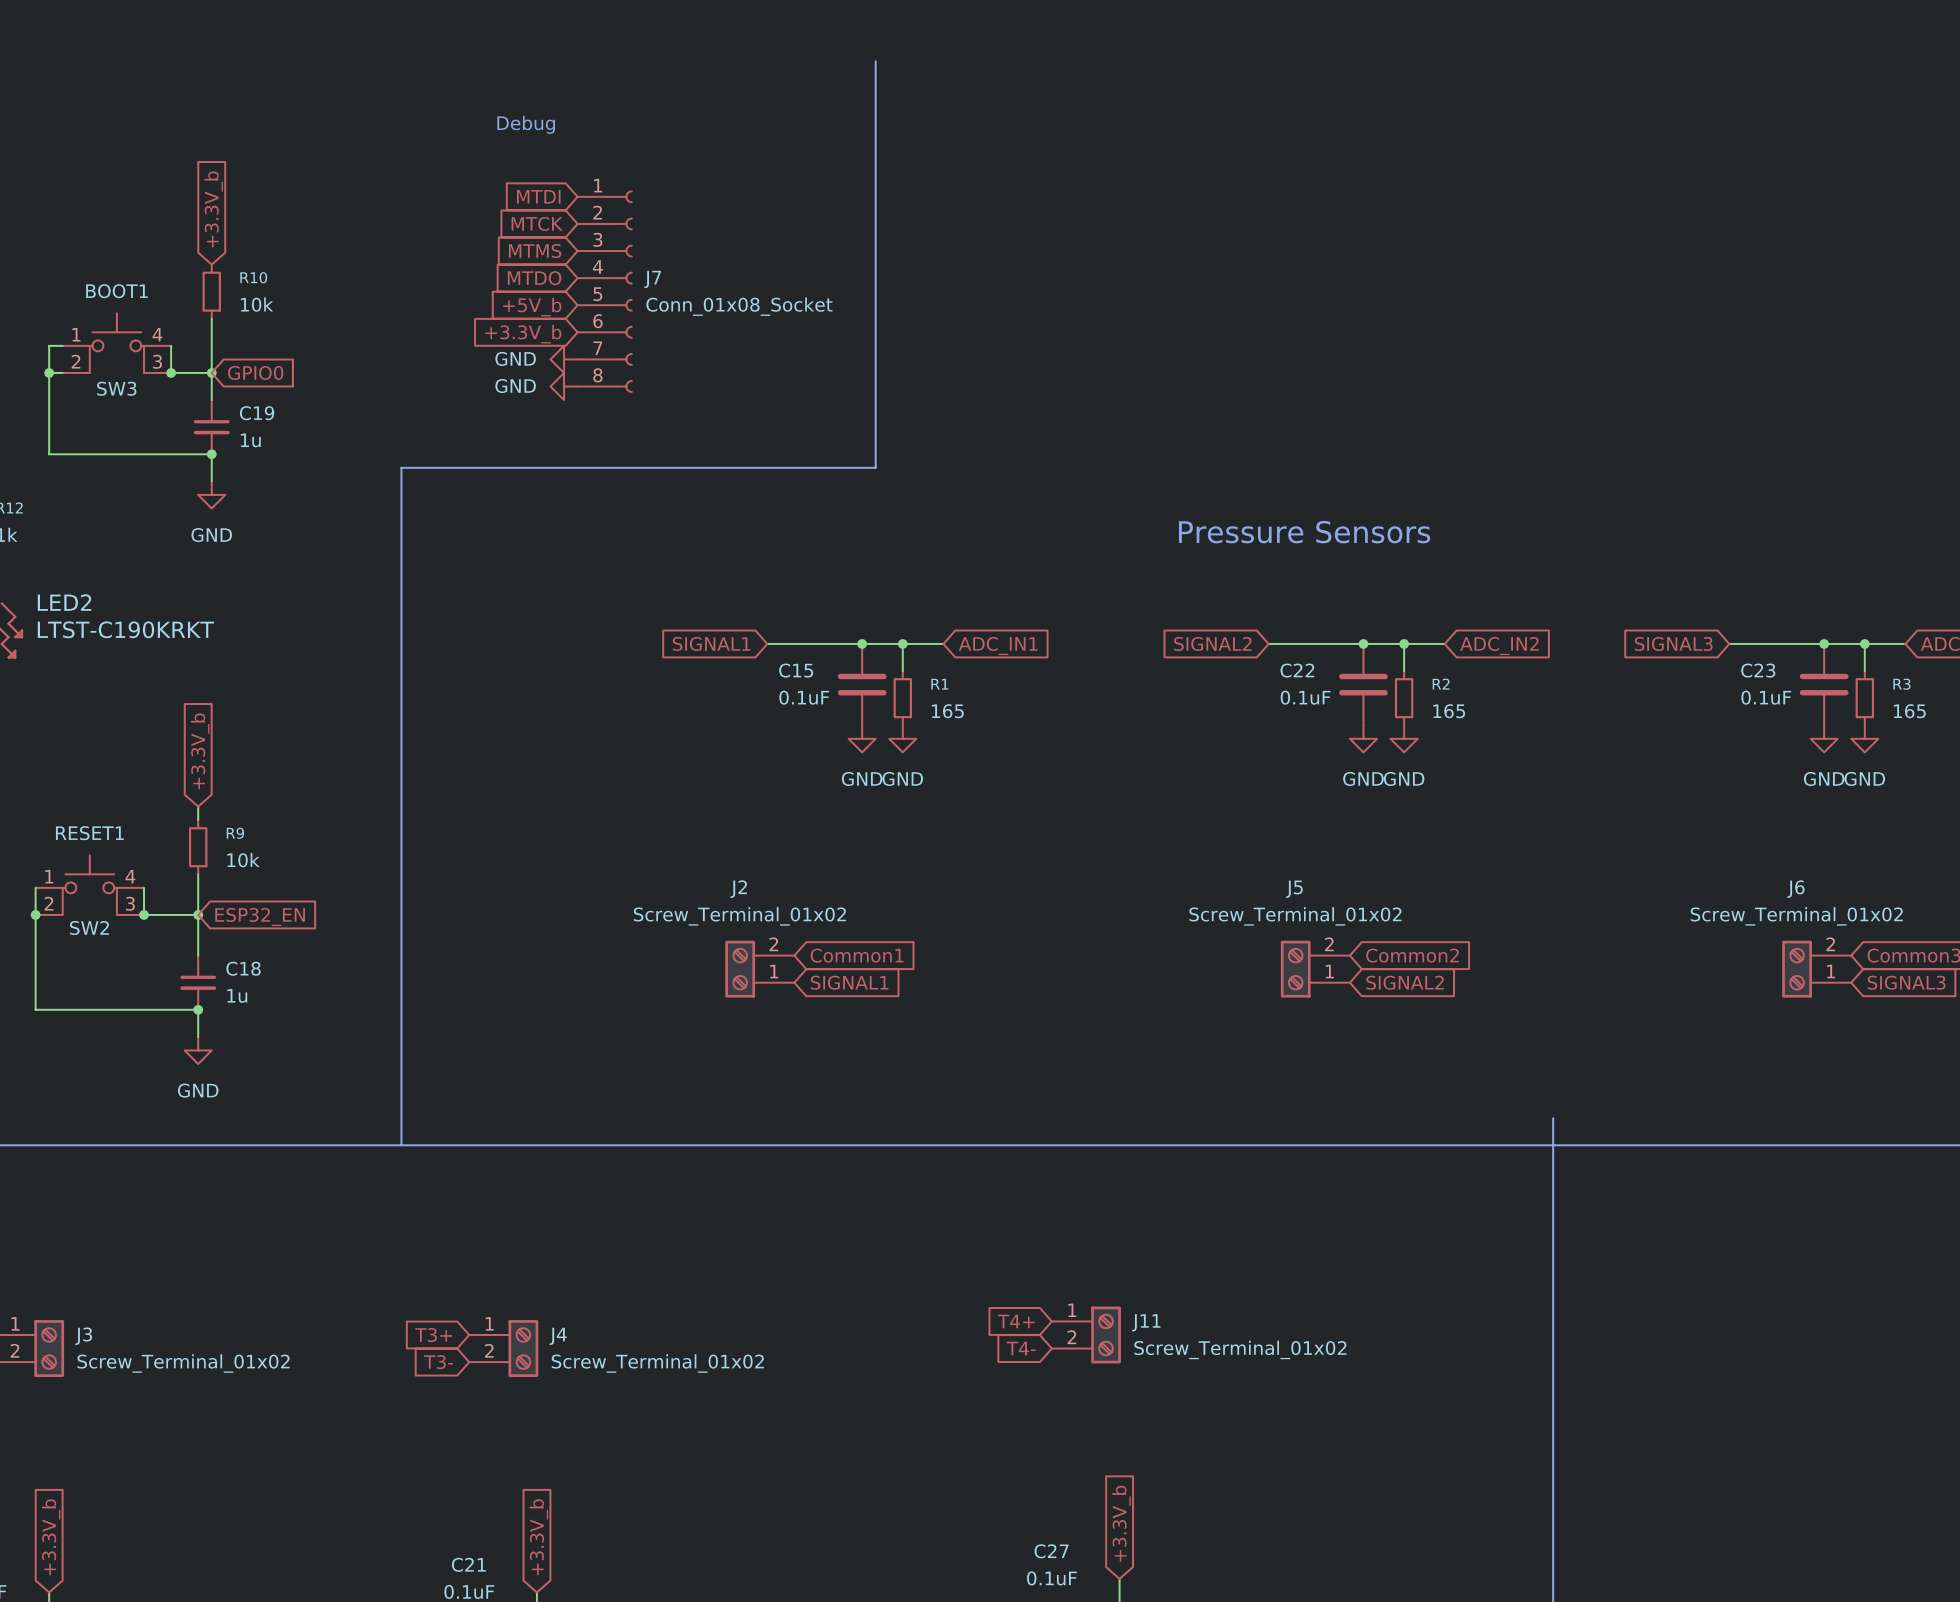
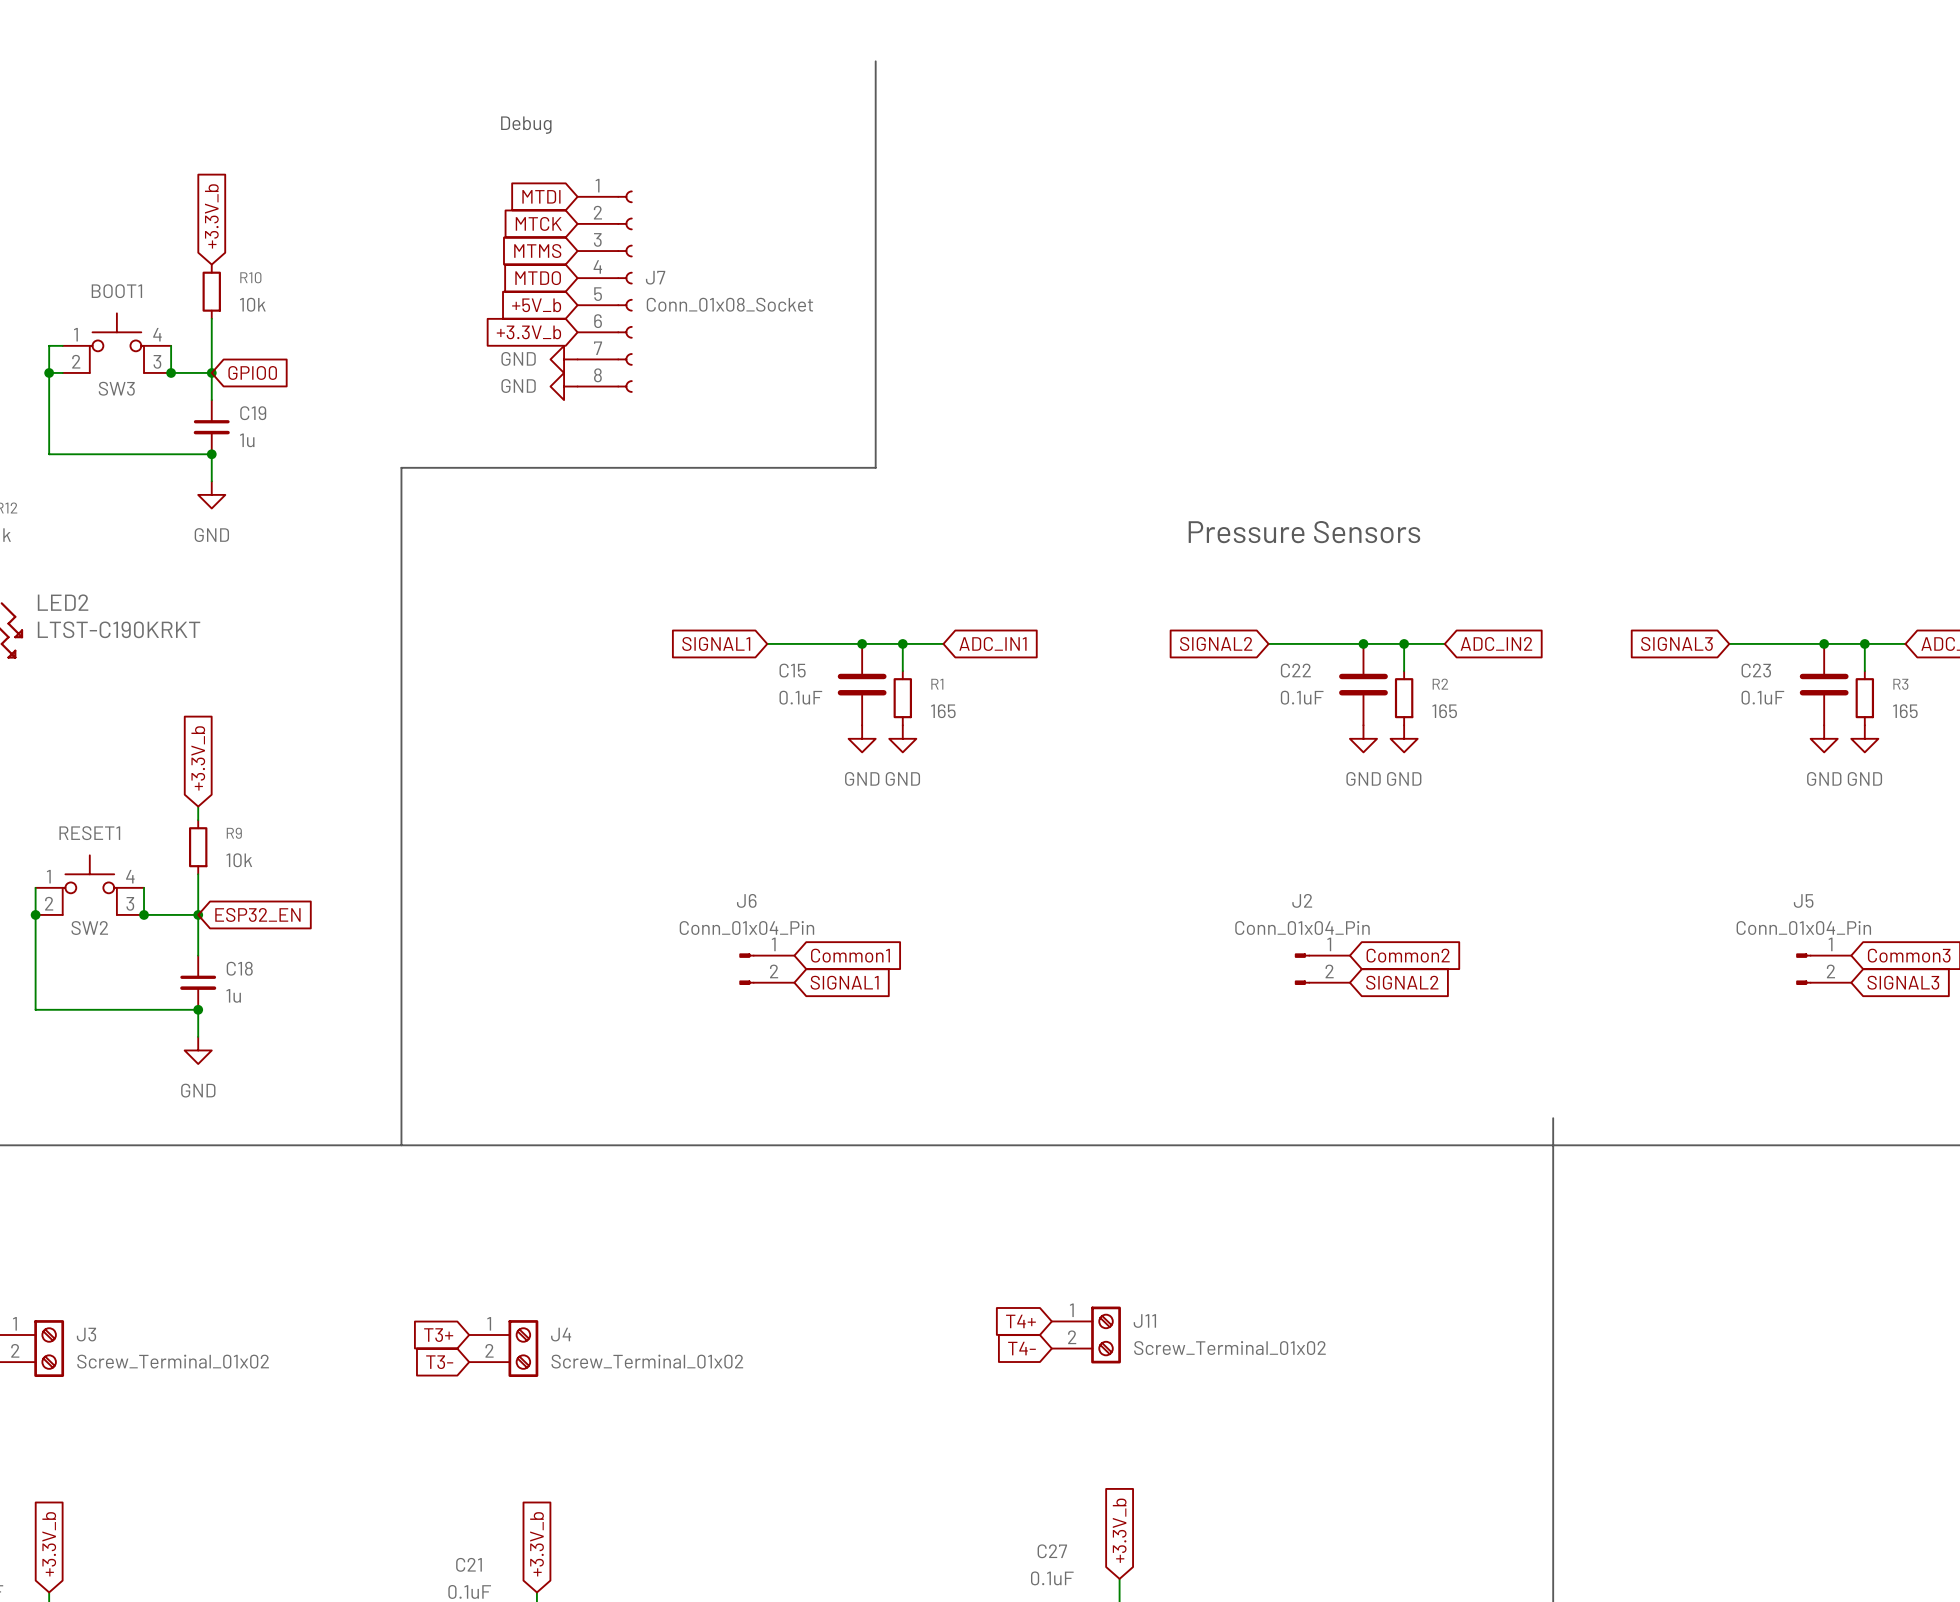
J2 value: Screw_Terminal_01x02 (739, 916) -> Conn_01x04_Pin (1302, 928)
J5 value: Screw_Terminal_01x02 (1295, 916) -> Conn_01x04_Pin (1803, 928)
J6 value: Screw_Terminal_01x02 (1796, 916) -> Conn_01x04_Pin (746, 928)
J2 symbol: [725, 940, 795, 998] -> [1294, 953, 1350, 985]
J5 symbol: [1280, 940, 1350, 998] -> [1796, 953, 1852, 985]
J6 symbol: [1782, 940, 1852, 998] -> [739, 953, 795, 985]

